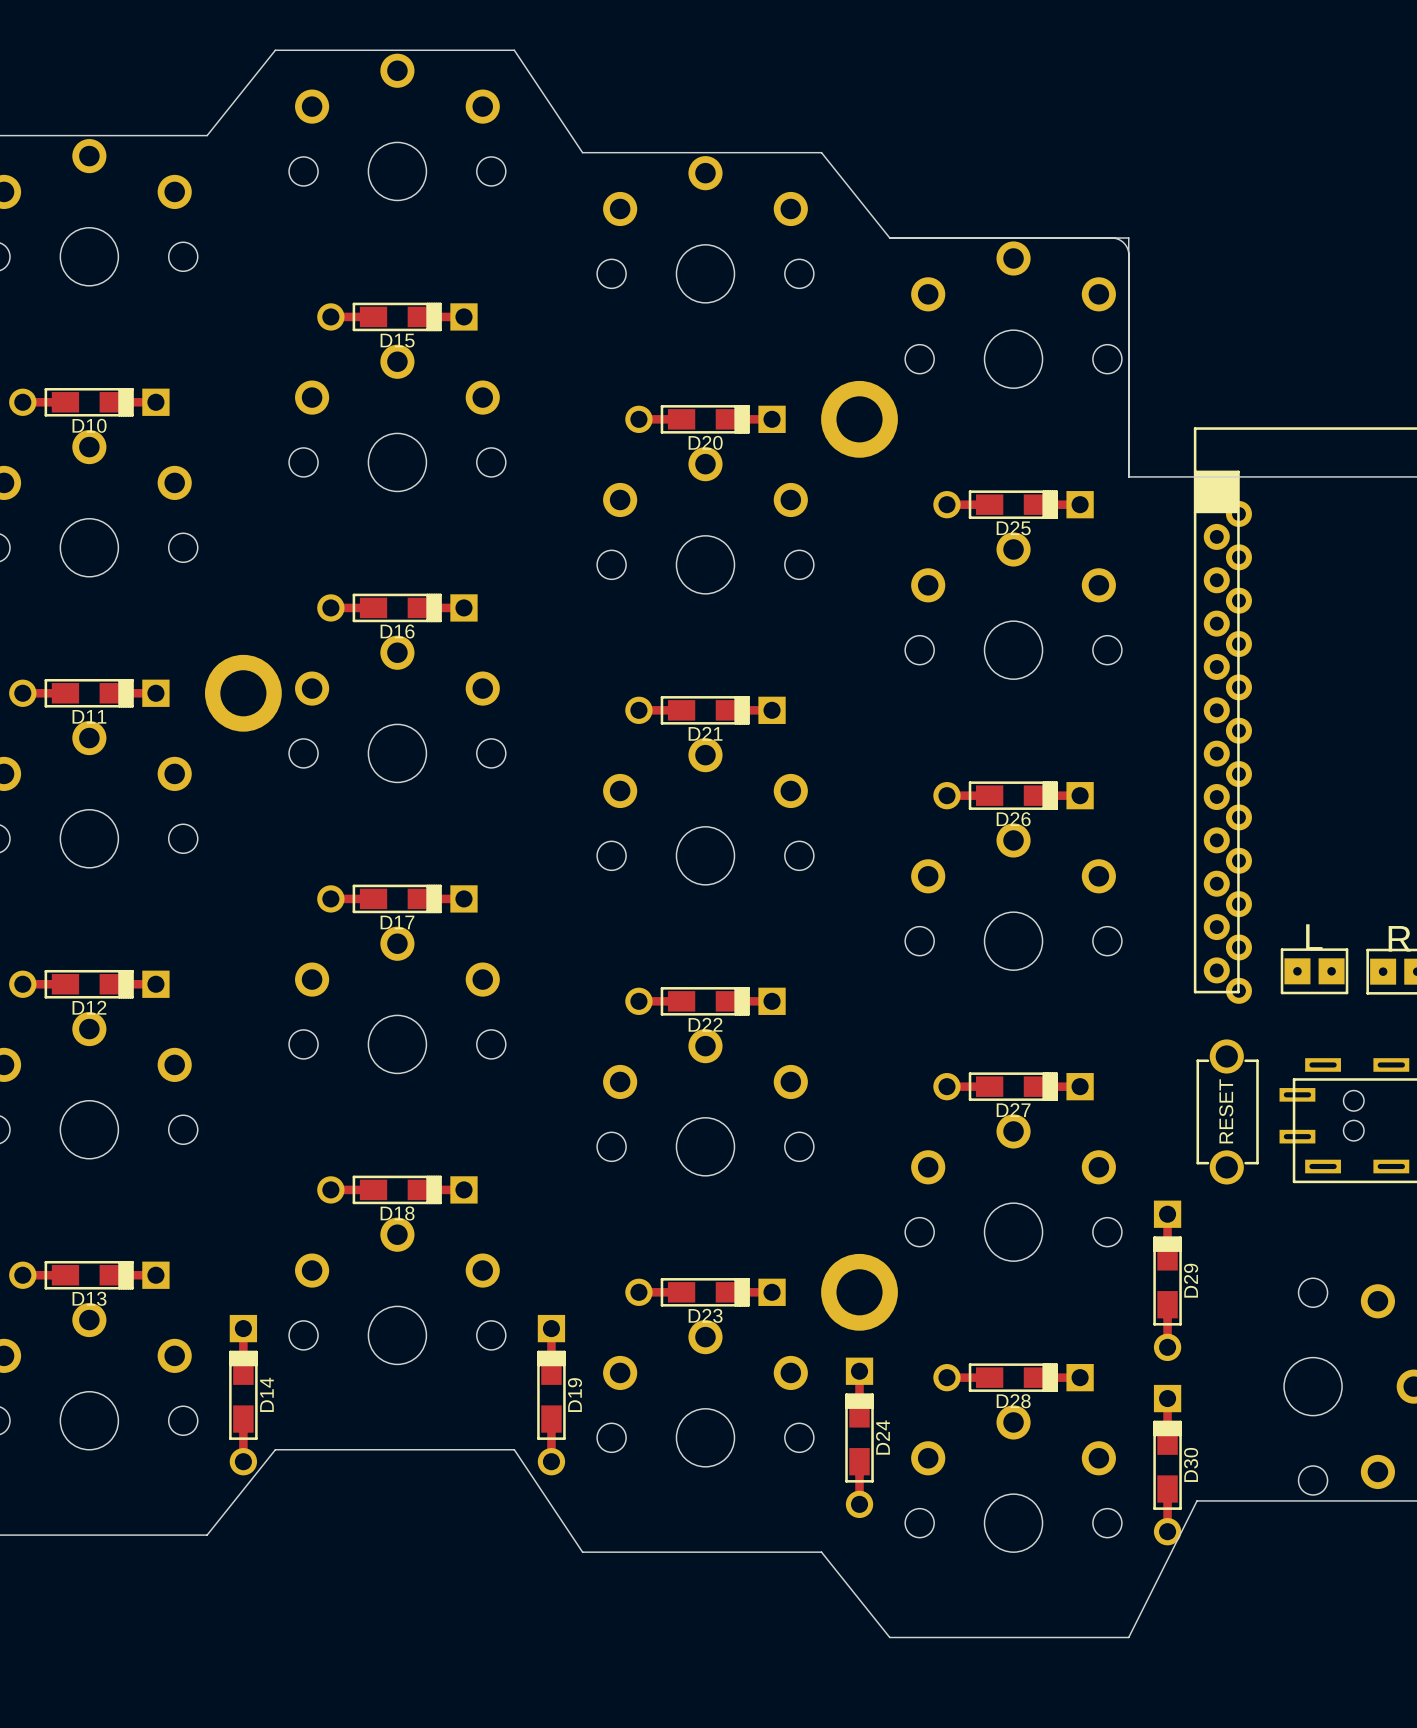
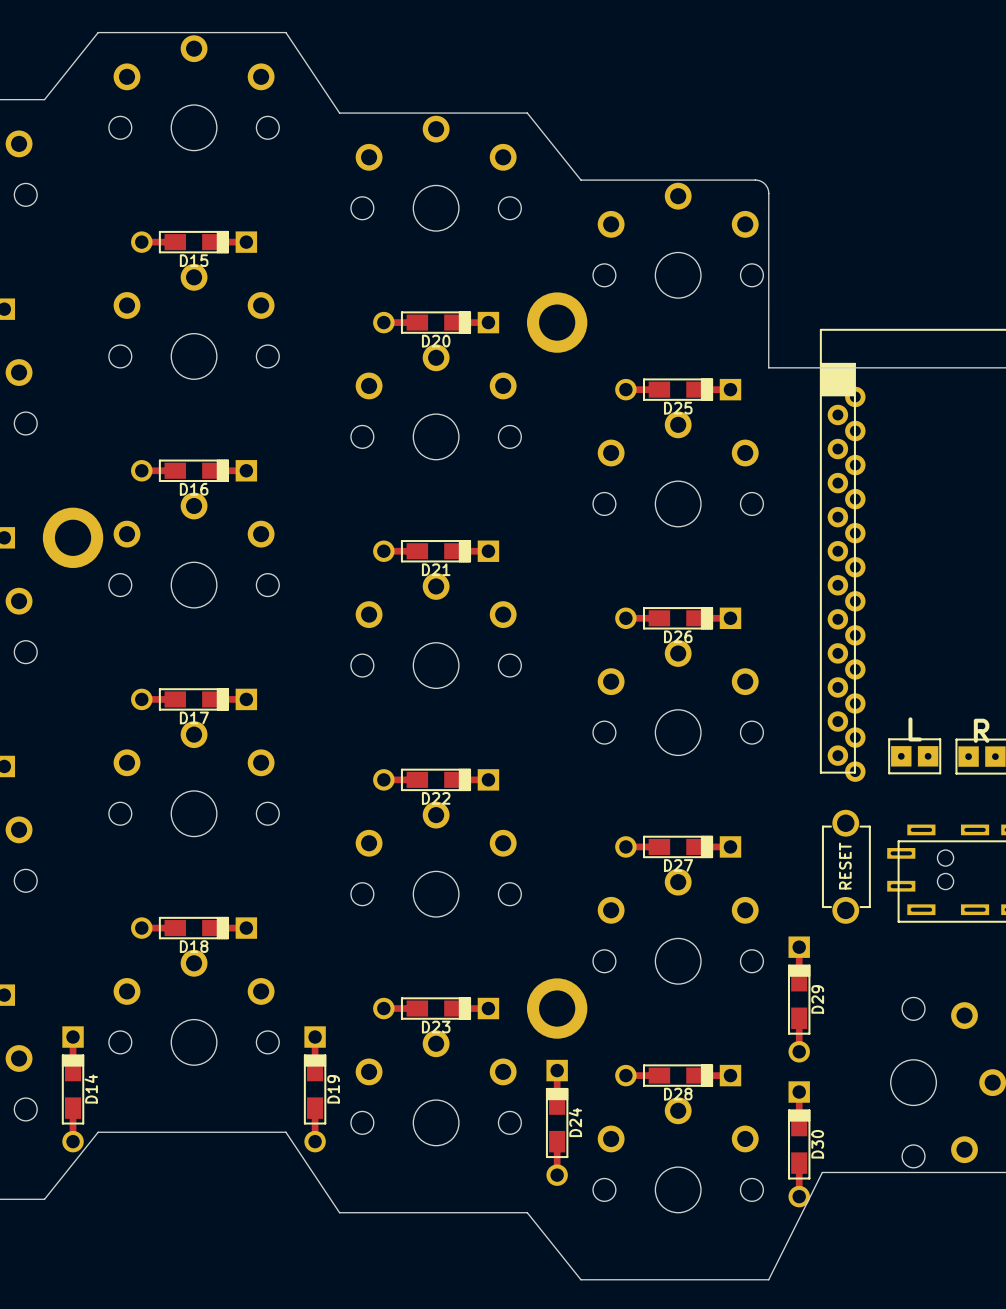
board edge: (889, 238) (1128, 238) (1128, 476) -> none

